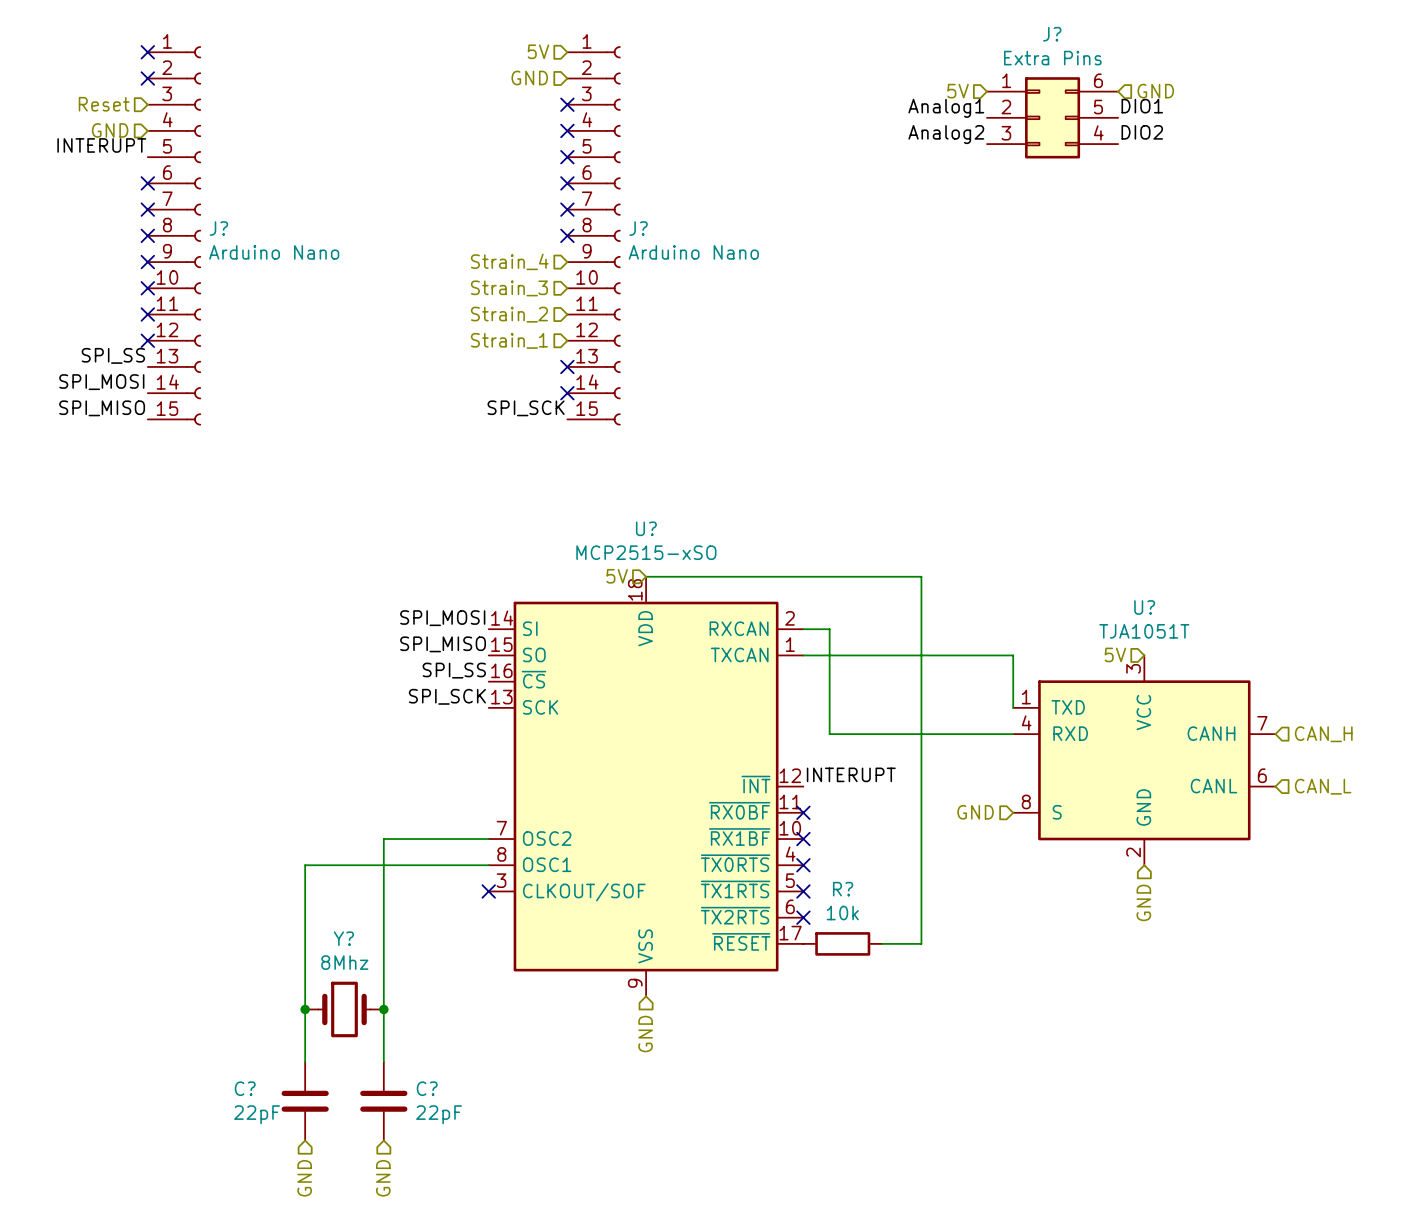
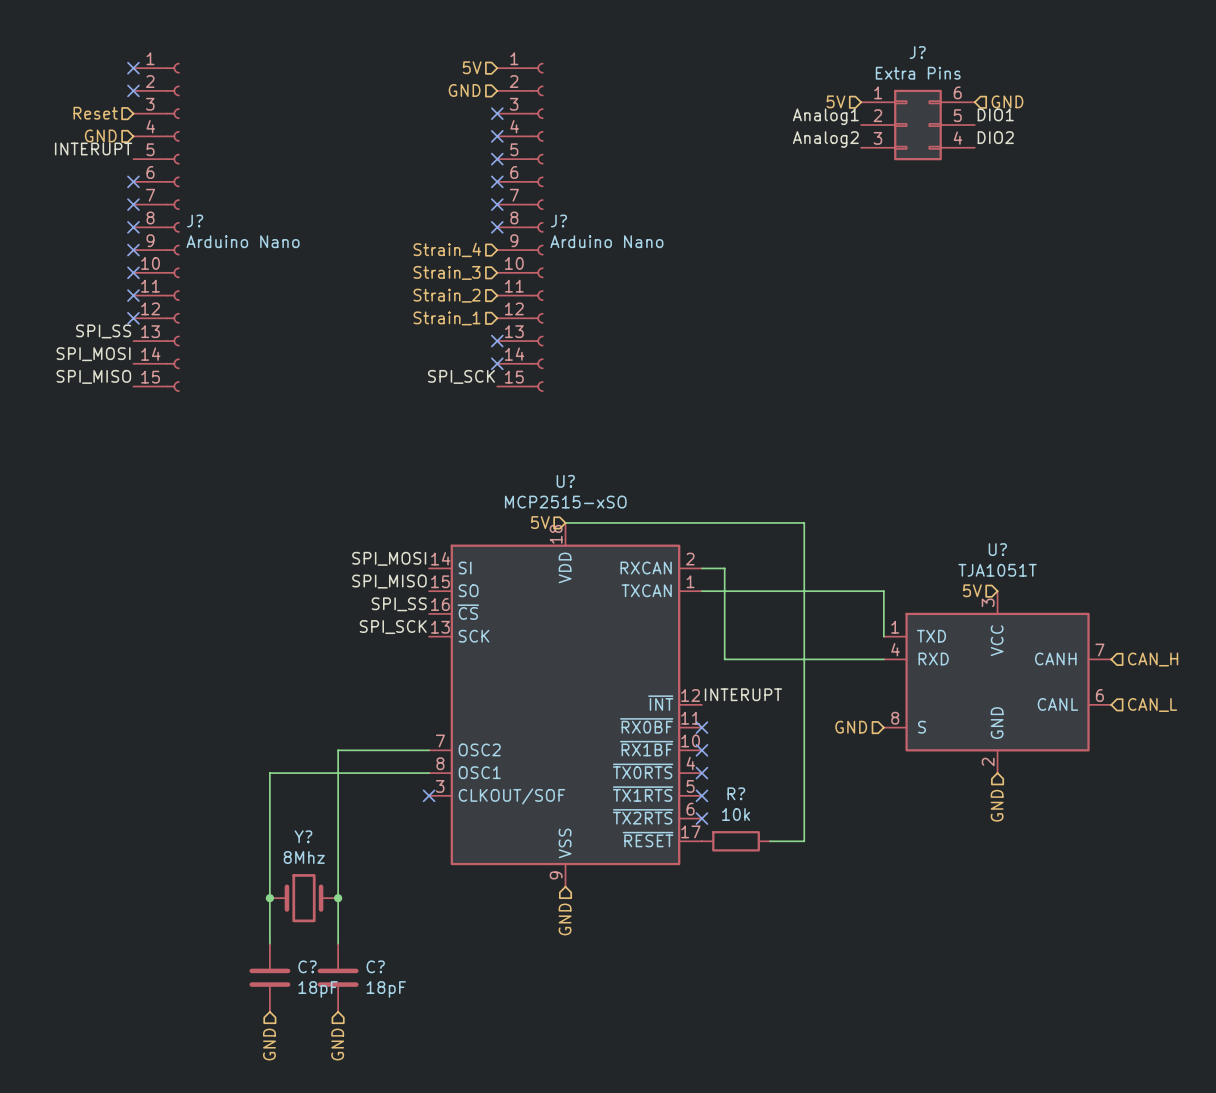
C? name position: C? (245, 1088) -> C? (307, 966)
C? value: 22pF (257, 1114) -> 18pF (318, 989)
C? value: 22pF (439, 1114) -> 18pF (386, 989)

